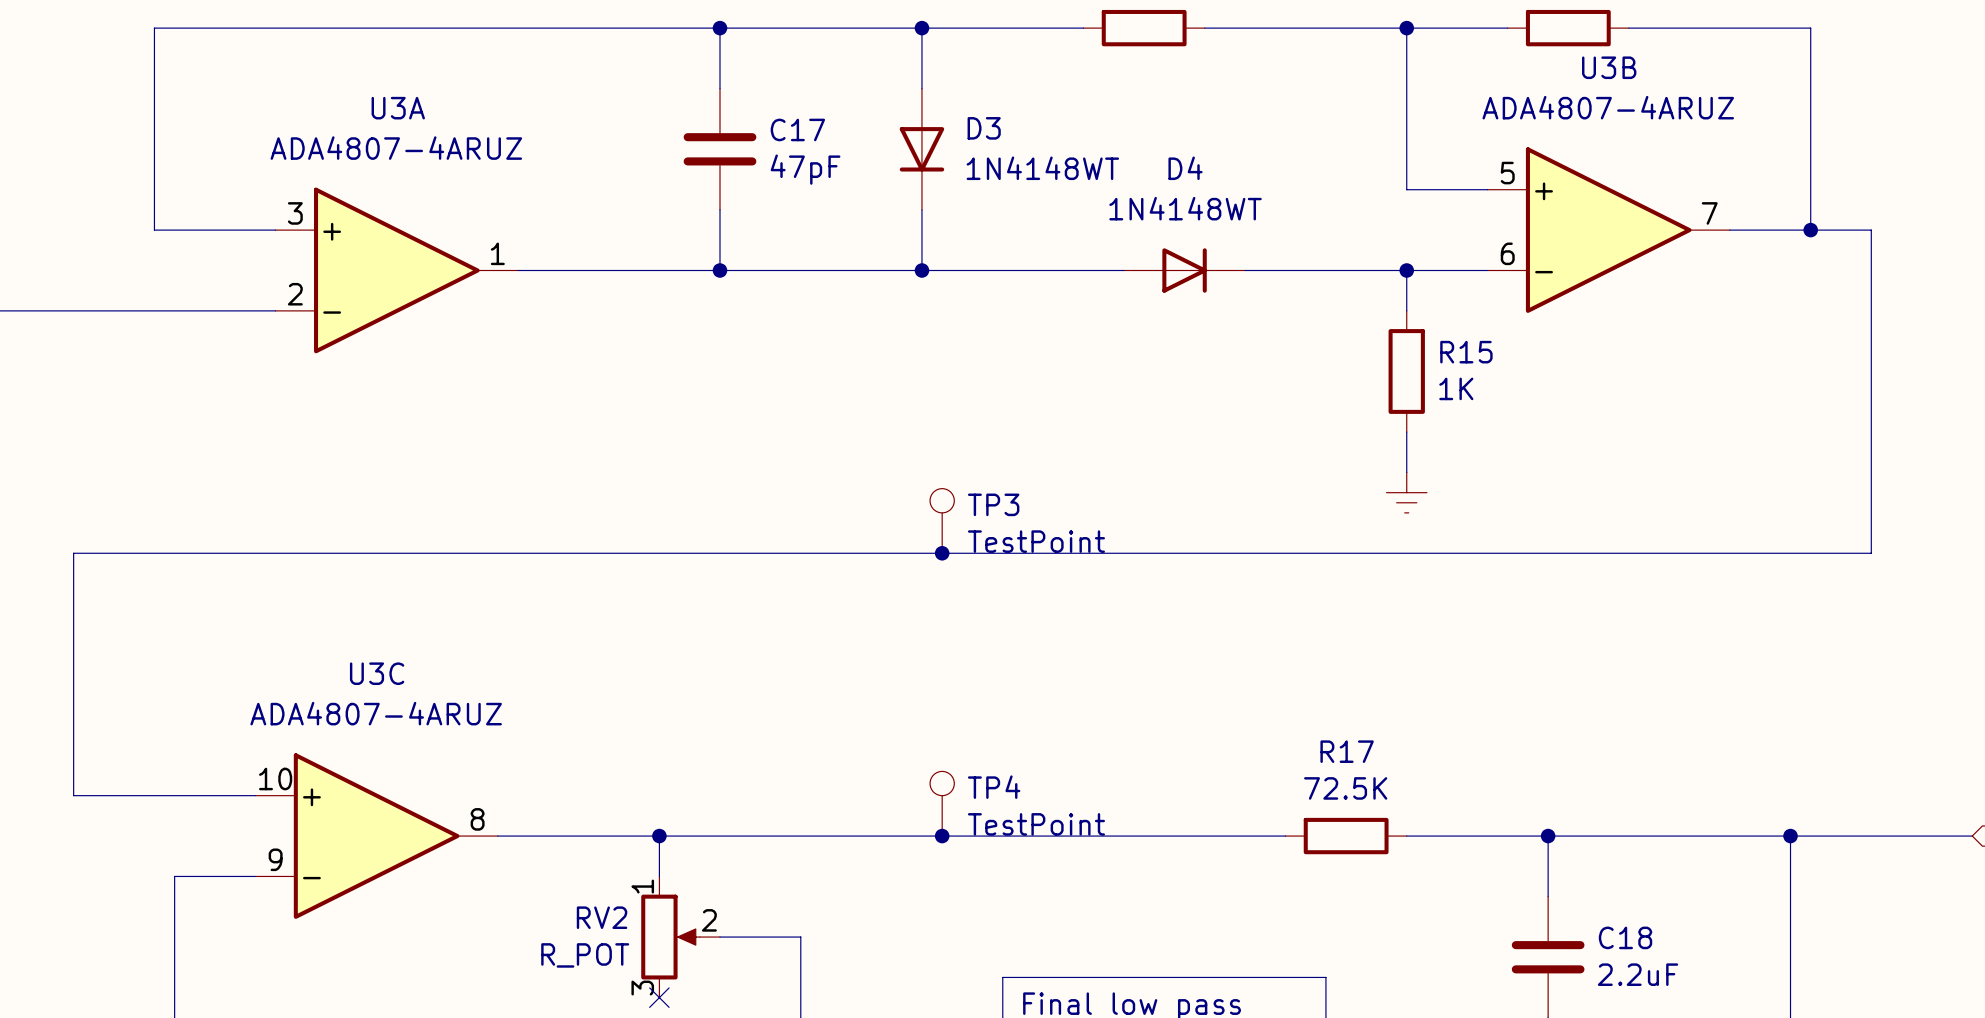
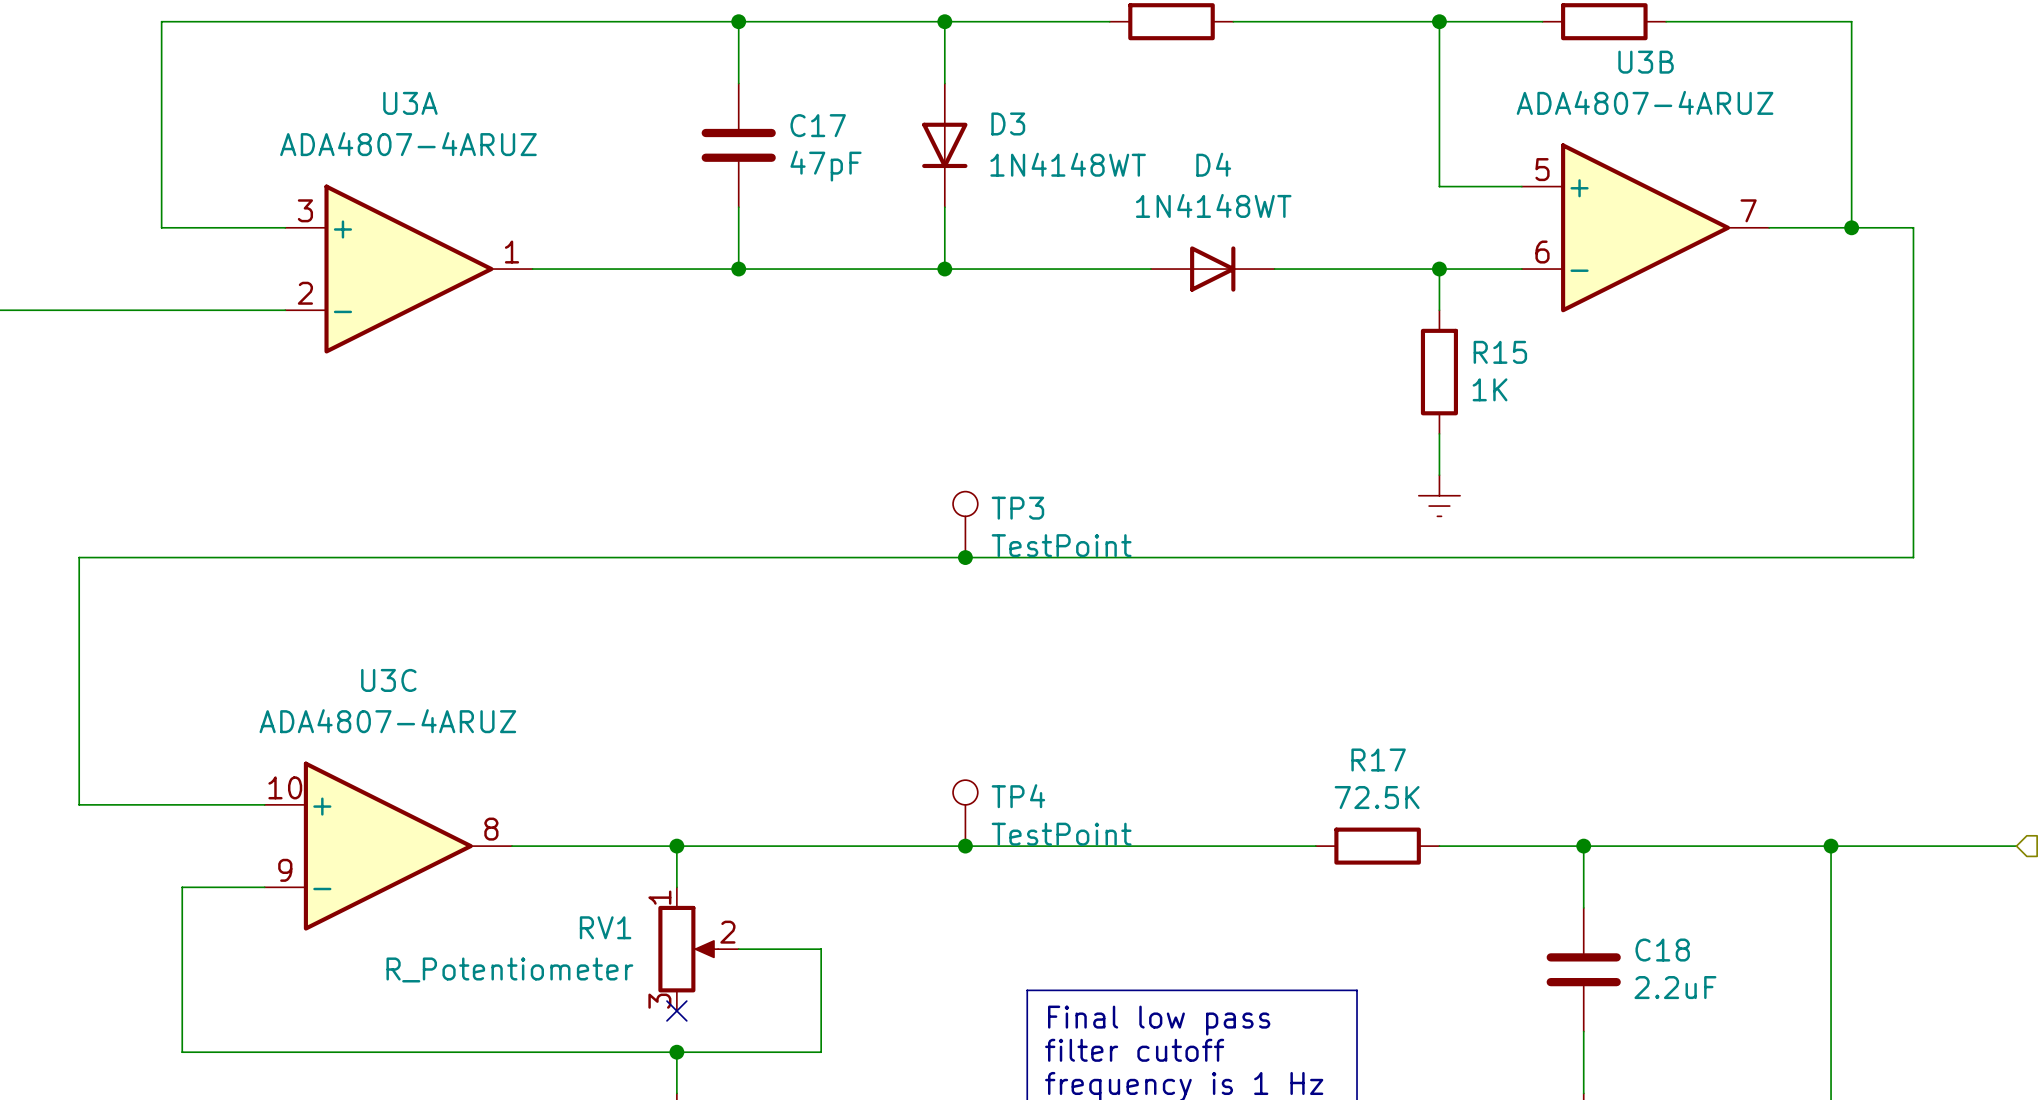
RV2 name: RV2 (602, 917) -> RV1 (605, 927)
RV2 value: R_POT (585, 955) -> R_Potentiometer (509, 969)

